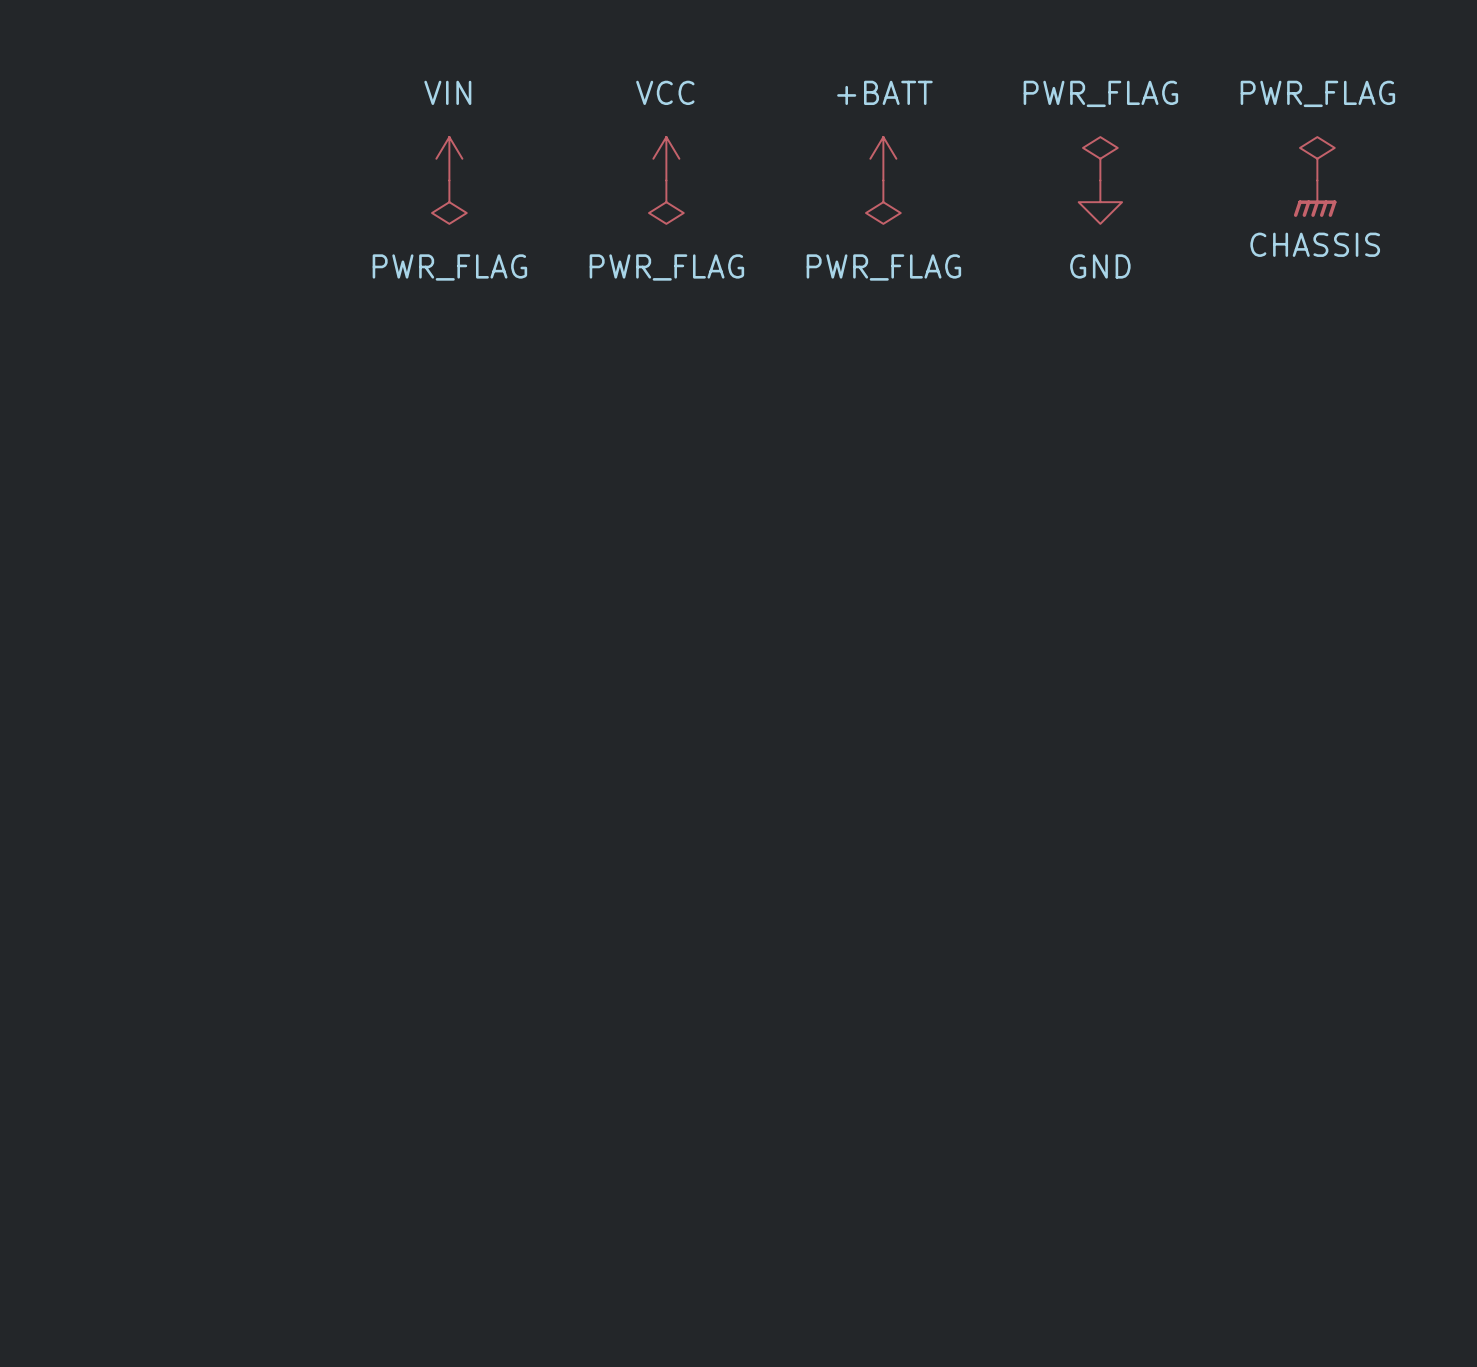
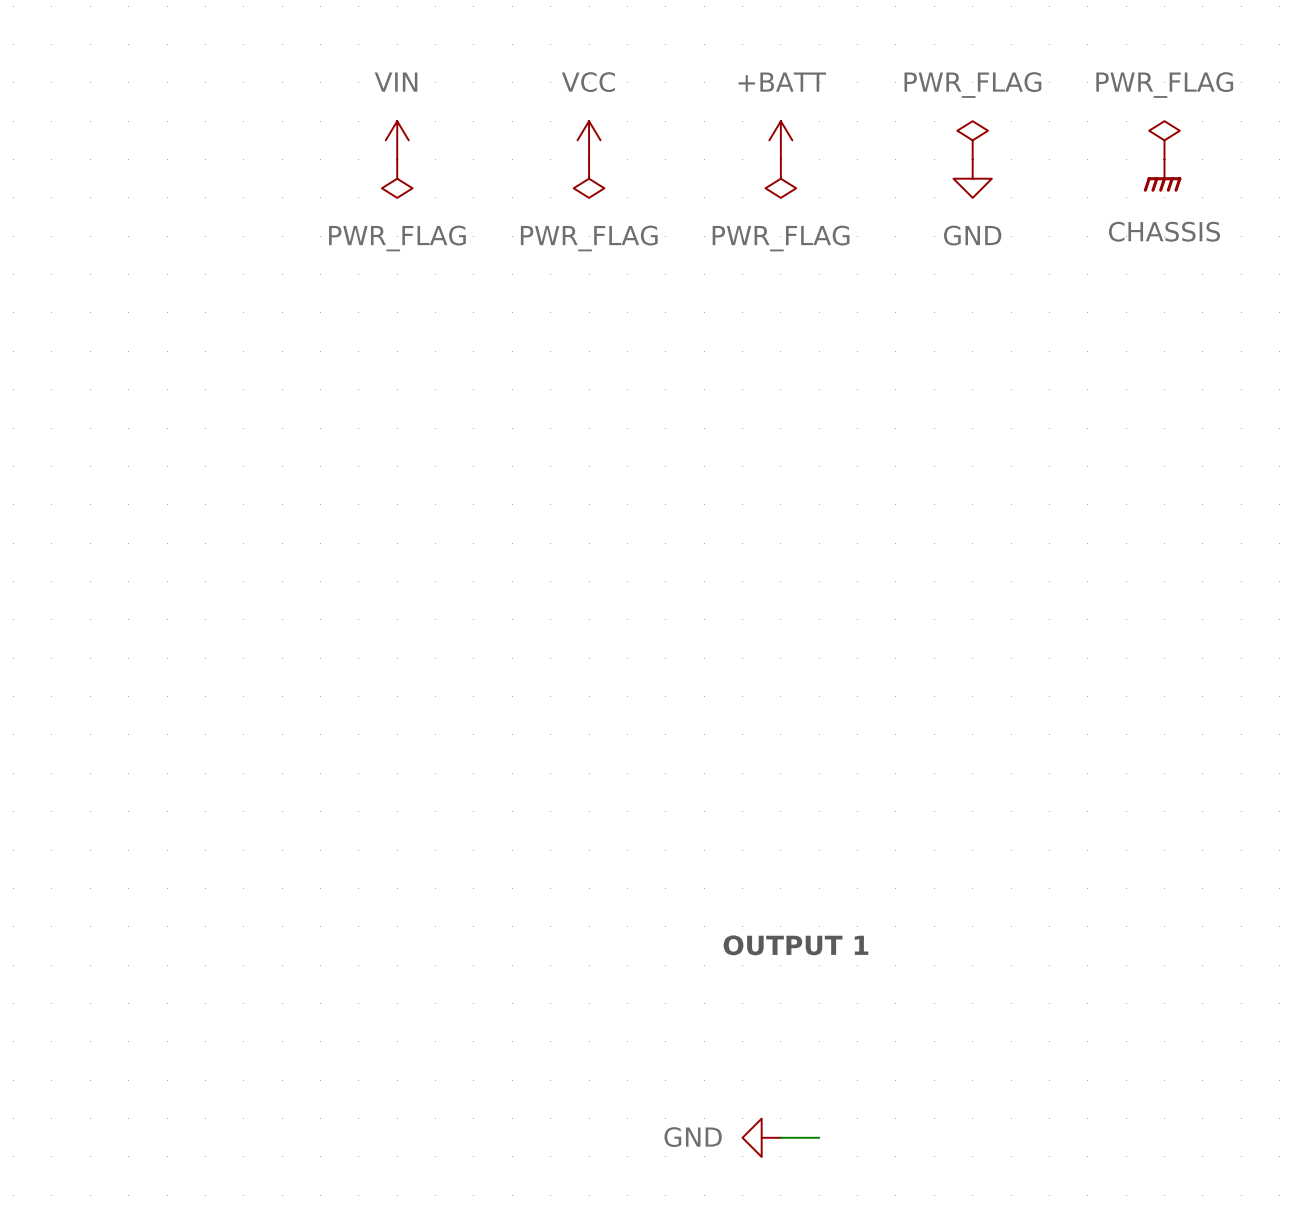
power symbol text position: CHASSIS (1315, 244) -> CHASSIS (1164, 231)
text: none -> OUTPUT 1 (795, 945)
power symbol: none -> GND (761, 1137)
wire: none -> (780, 1137) (819, 1137)

